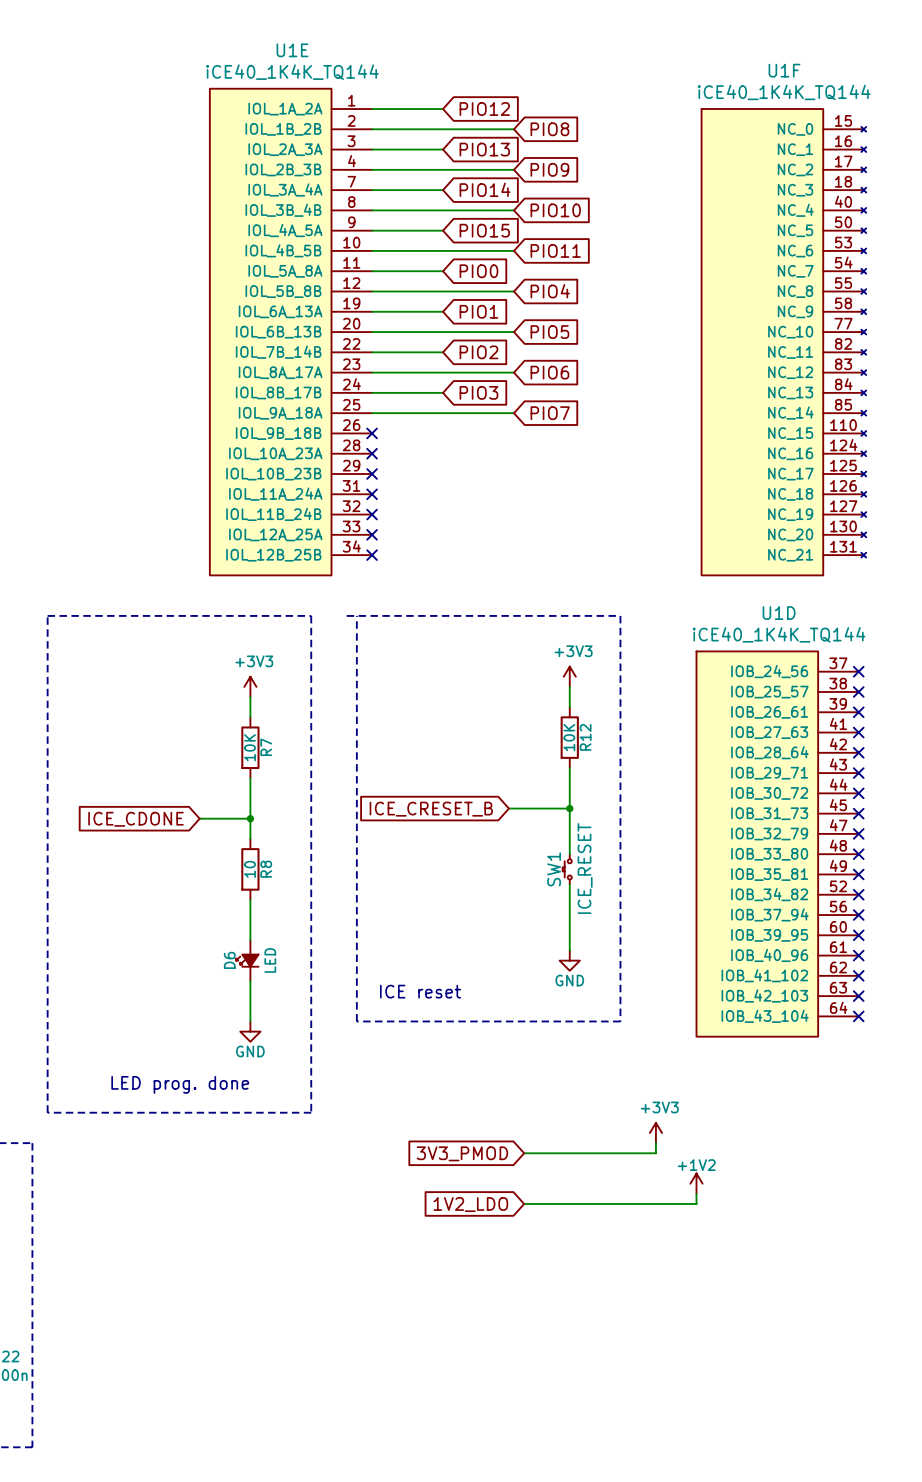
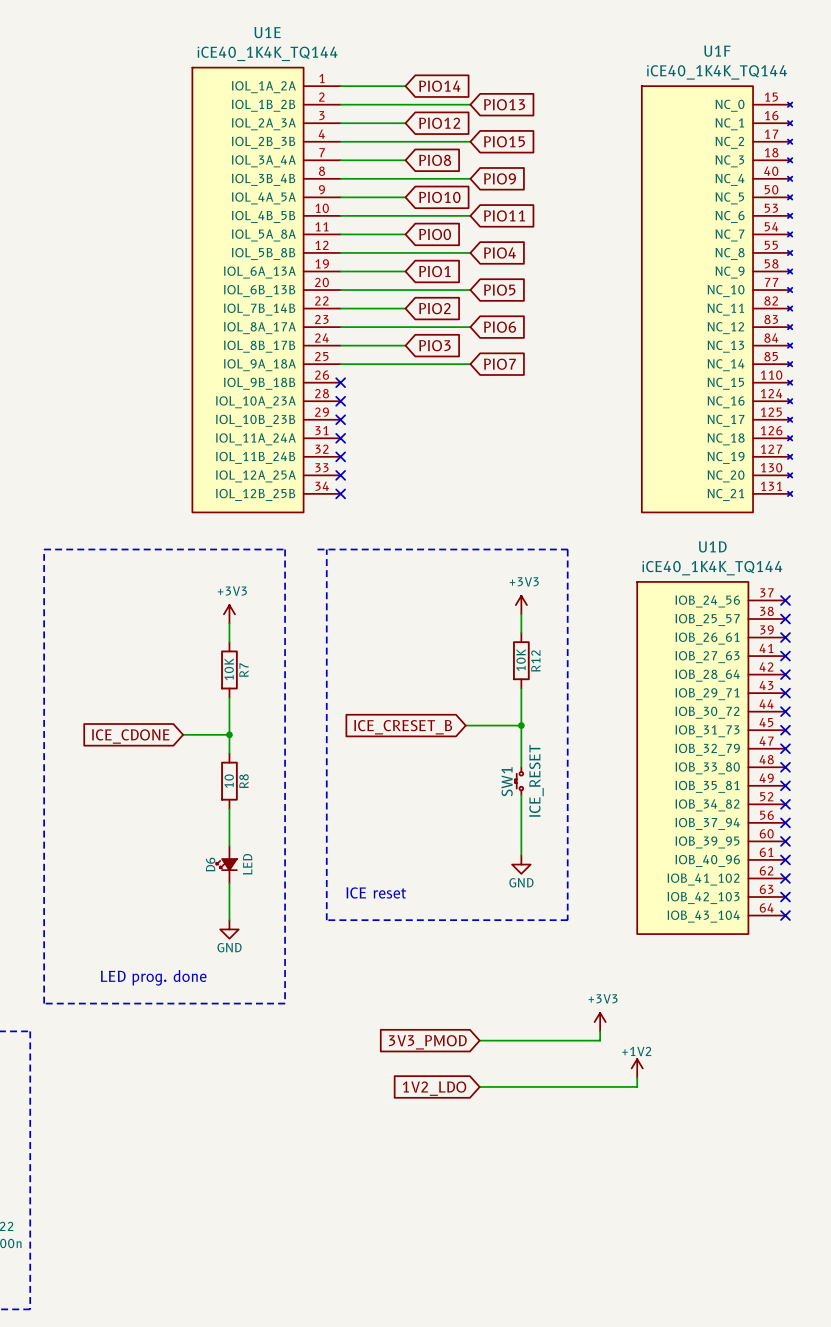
global label: PIO12 (484, 109) -> PIO14 (439, 86)
global label: PIO8 (549, 129) -> PIO13 (504, 104)
global label: PIO13 (484, 149) -> PIO12 (439, 123)
global label: PIO9 (549, 169) -> PIO15 (504, 141)
global label: PIO14 (485, 189) -> PIO8 (435, 160)
global label: PIO10 (555, 210) -> PIO9 (500, 178)
global label: PIO15 (484, 230) -> PIO10 (439, 197)

